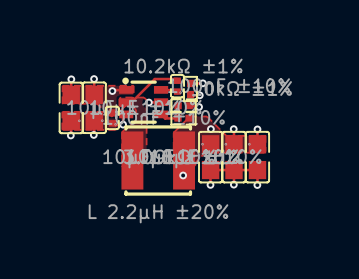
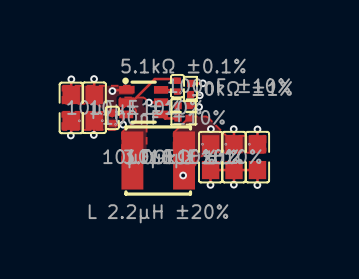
part value: 10.2kΩ ±1% (183, 66) -> 5.1kΩ ±0.1% (183, 66)

